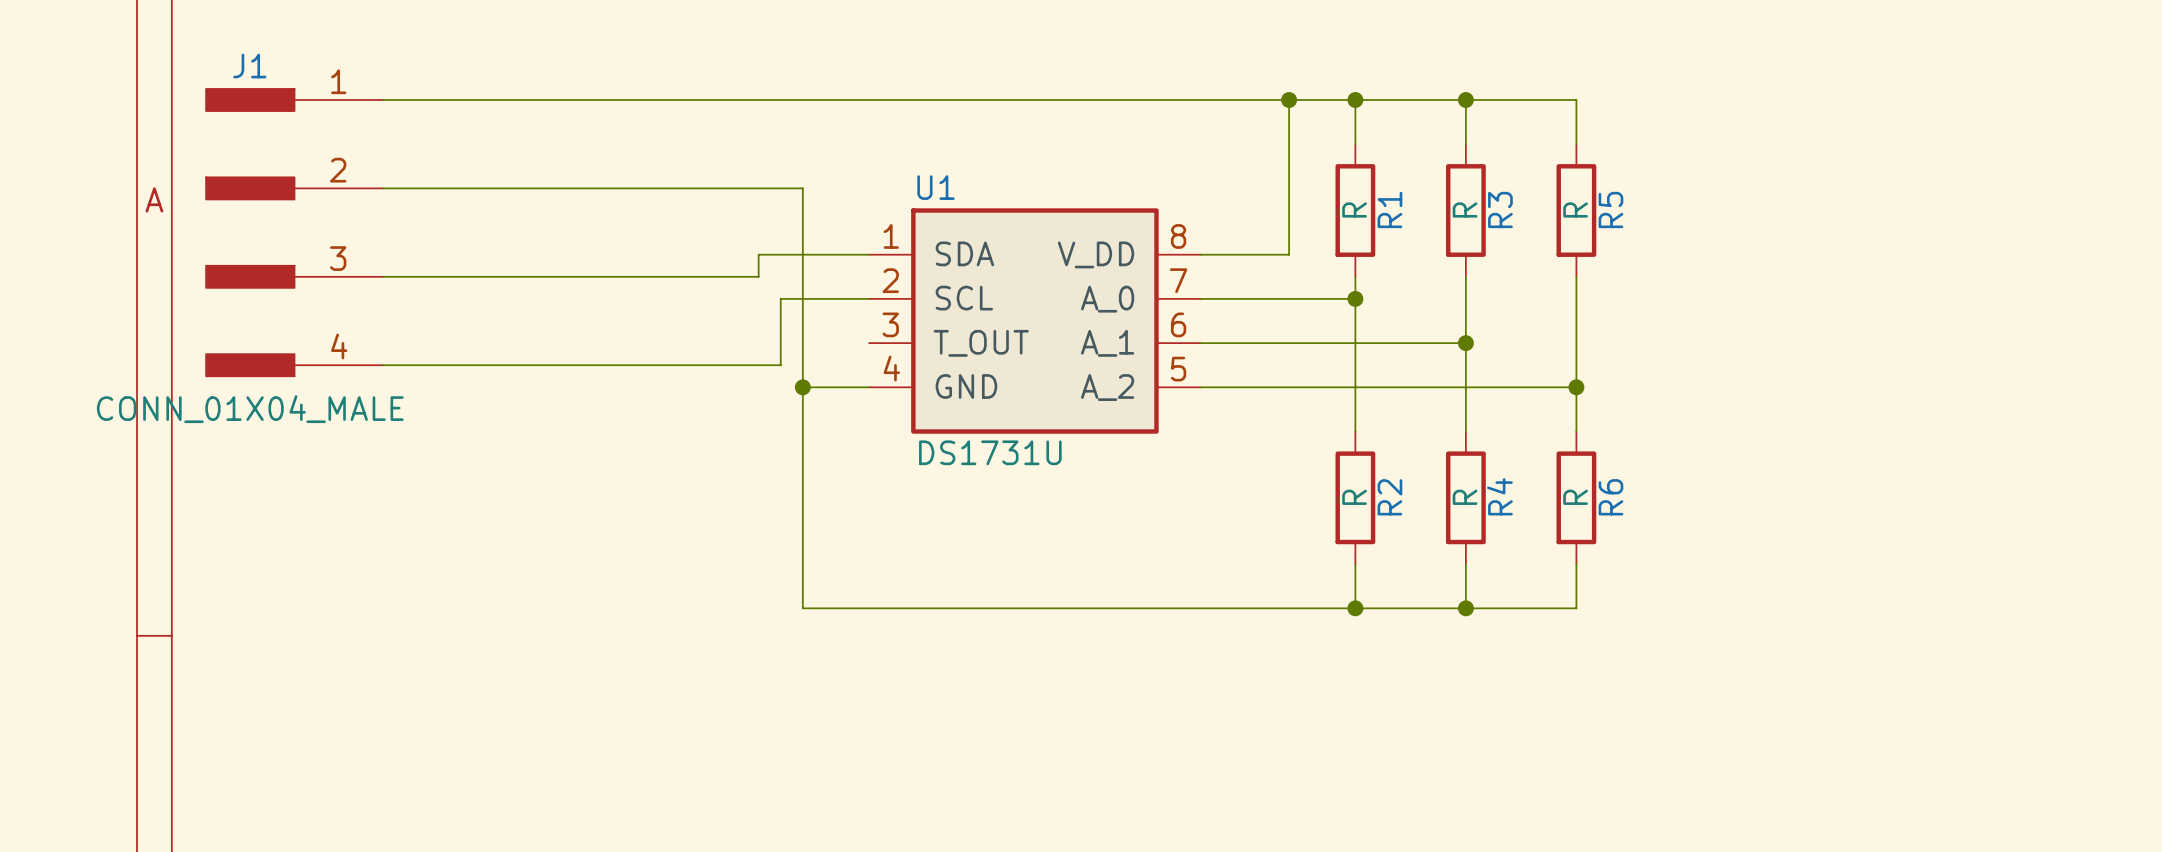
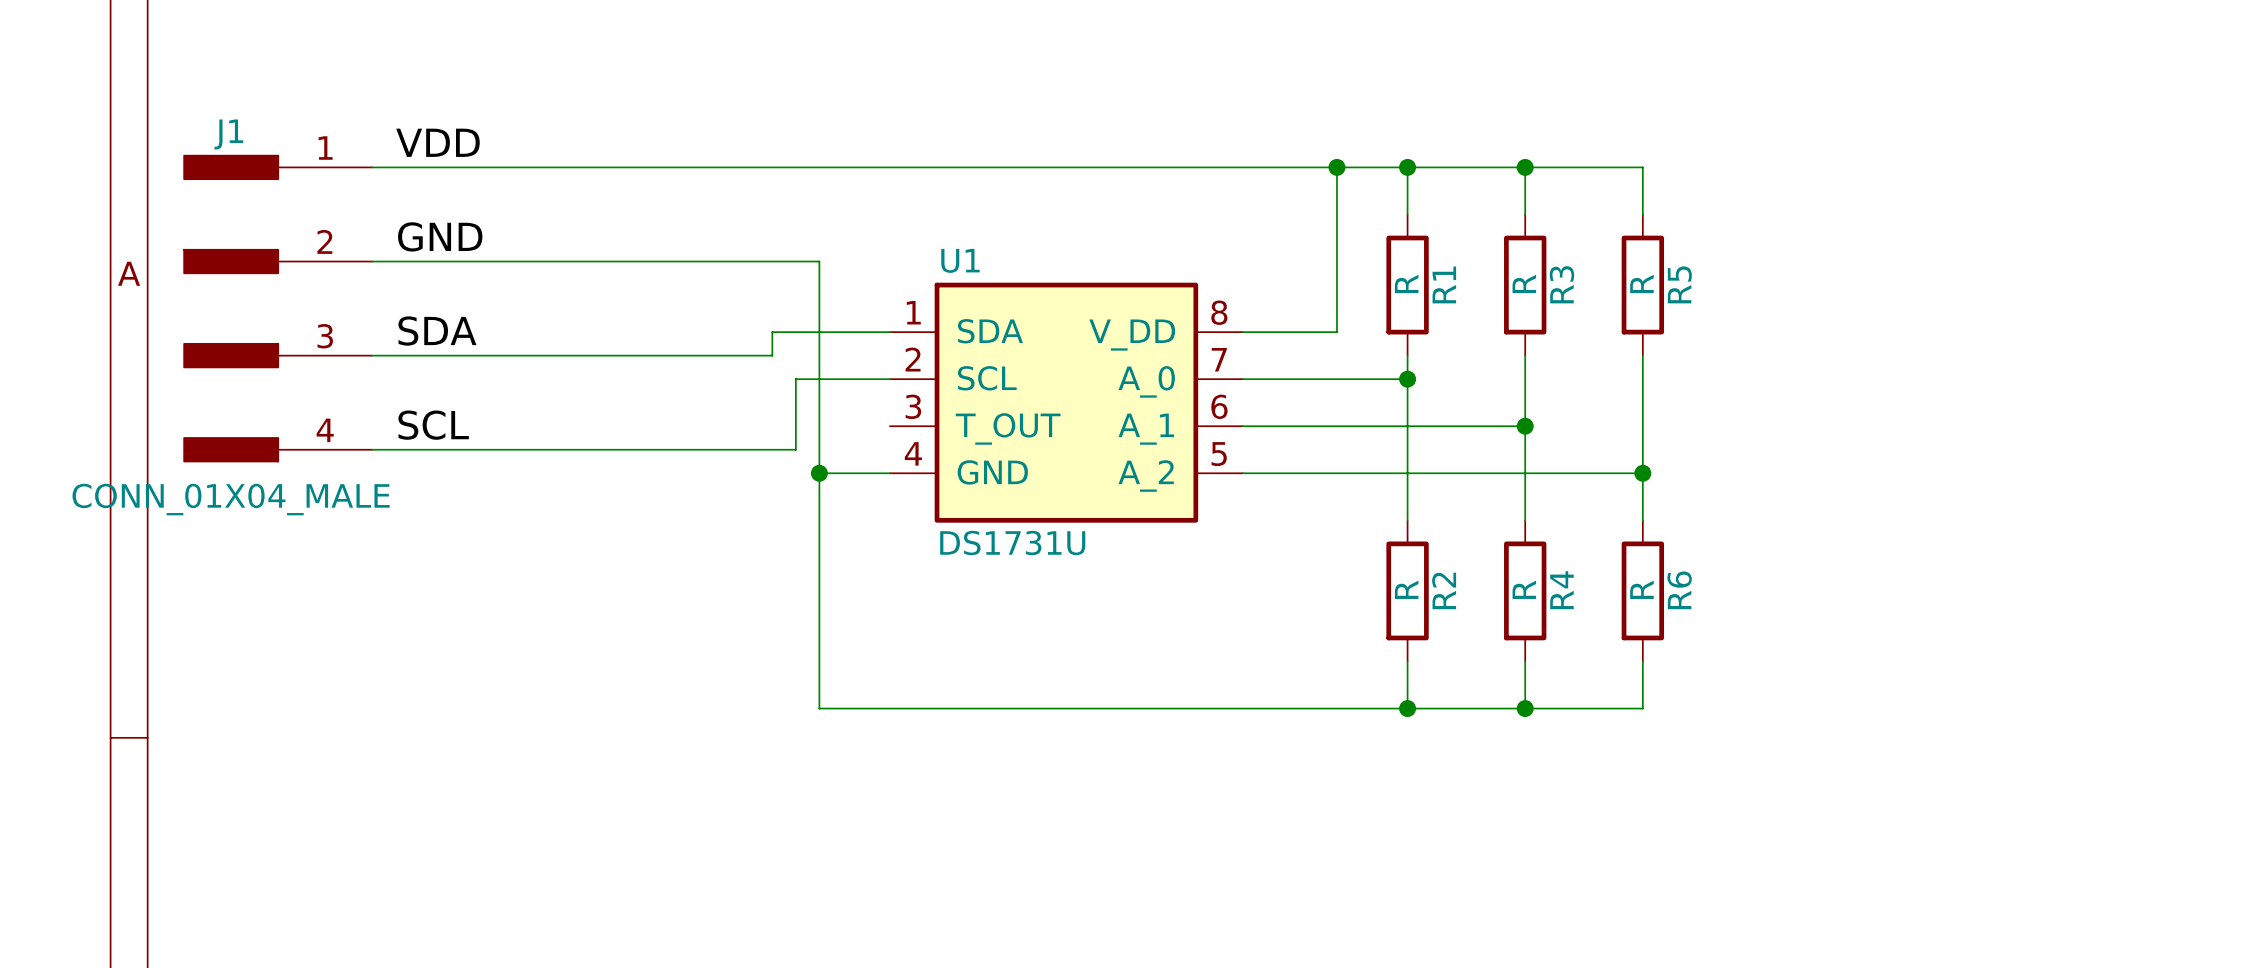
label: none -> VDD (437, 142)
label: none -> GND (440, 236)
label: none -> SDA (437, 331)
label: none -> SCL (433, 425)

